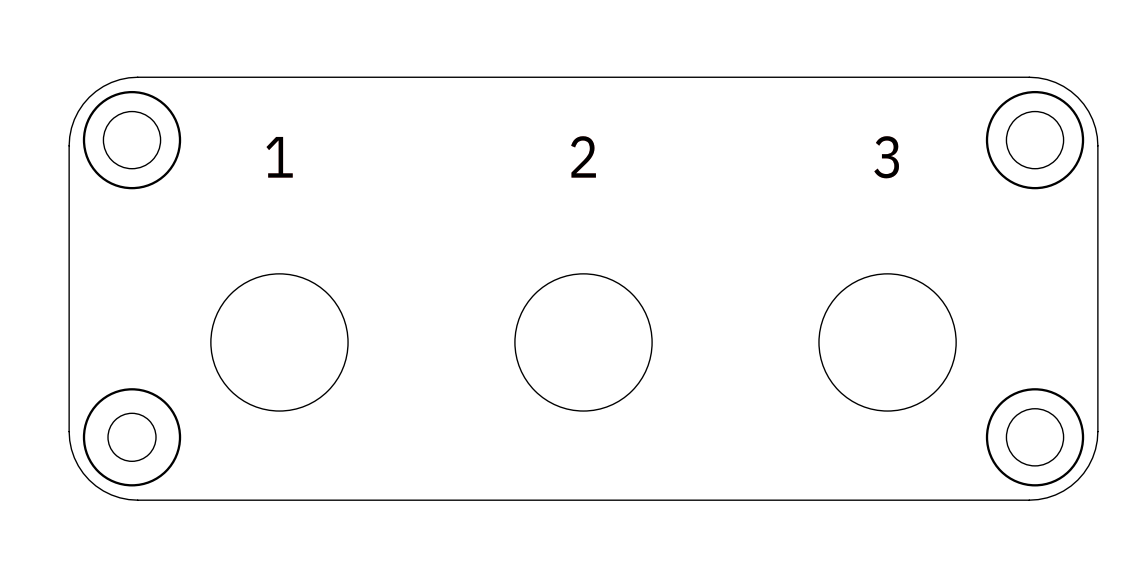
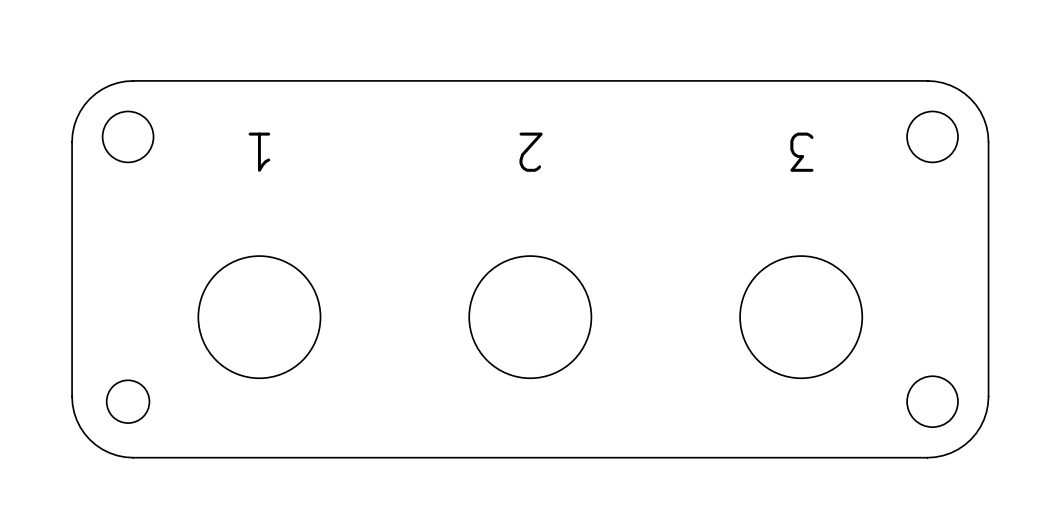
round board edge: [82, 90, 182, 190] -> none
round board edge: [985, 90, 1085, 190] -> none
text: 2 (583, 156) -> none
text: 1 (279, 157) -> none
text: none -> 1 (259, 152)
text: none -> 2 (531, 152)
text: 3 (886, 157) -> none
text: none -> 3 (801, 152)
round board edge: [82, 388, 182, 487] -> none
round board edge: [985, 388, 1085, 487] -> none

